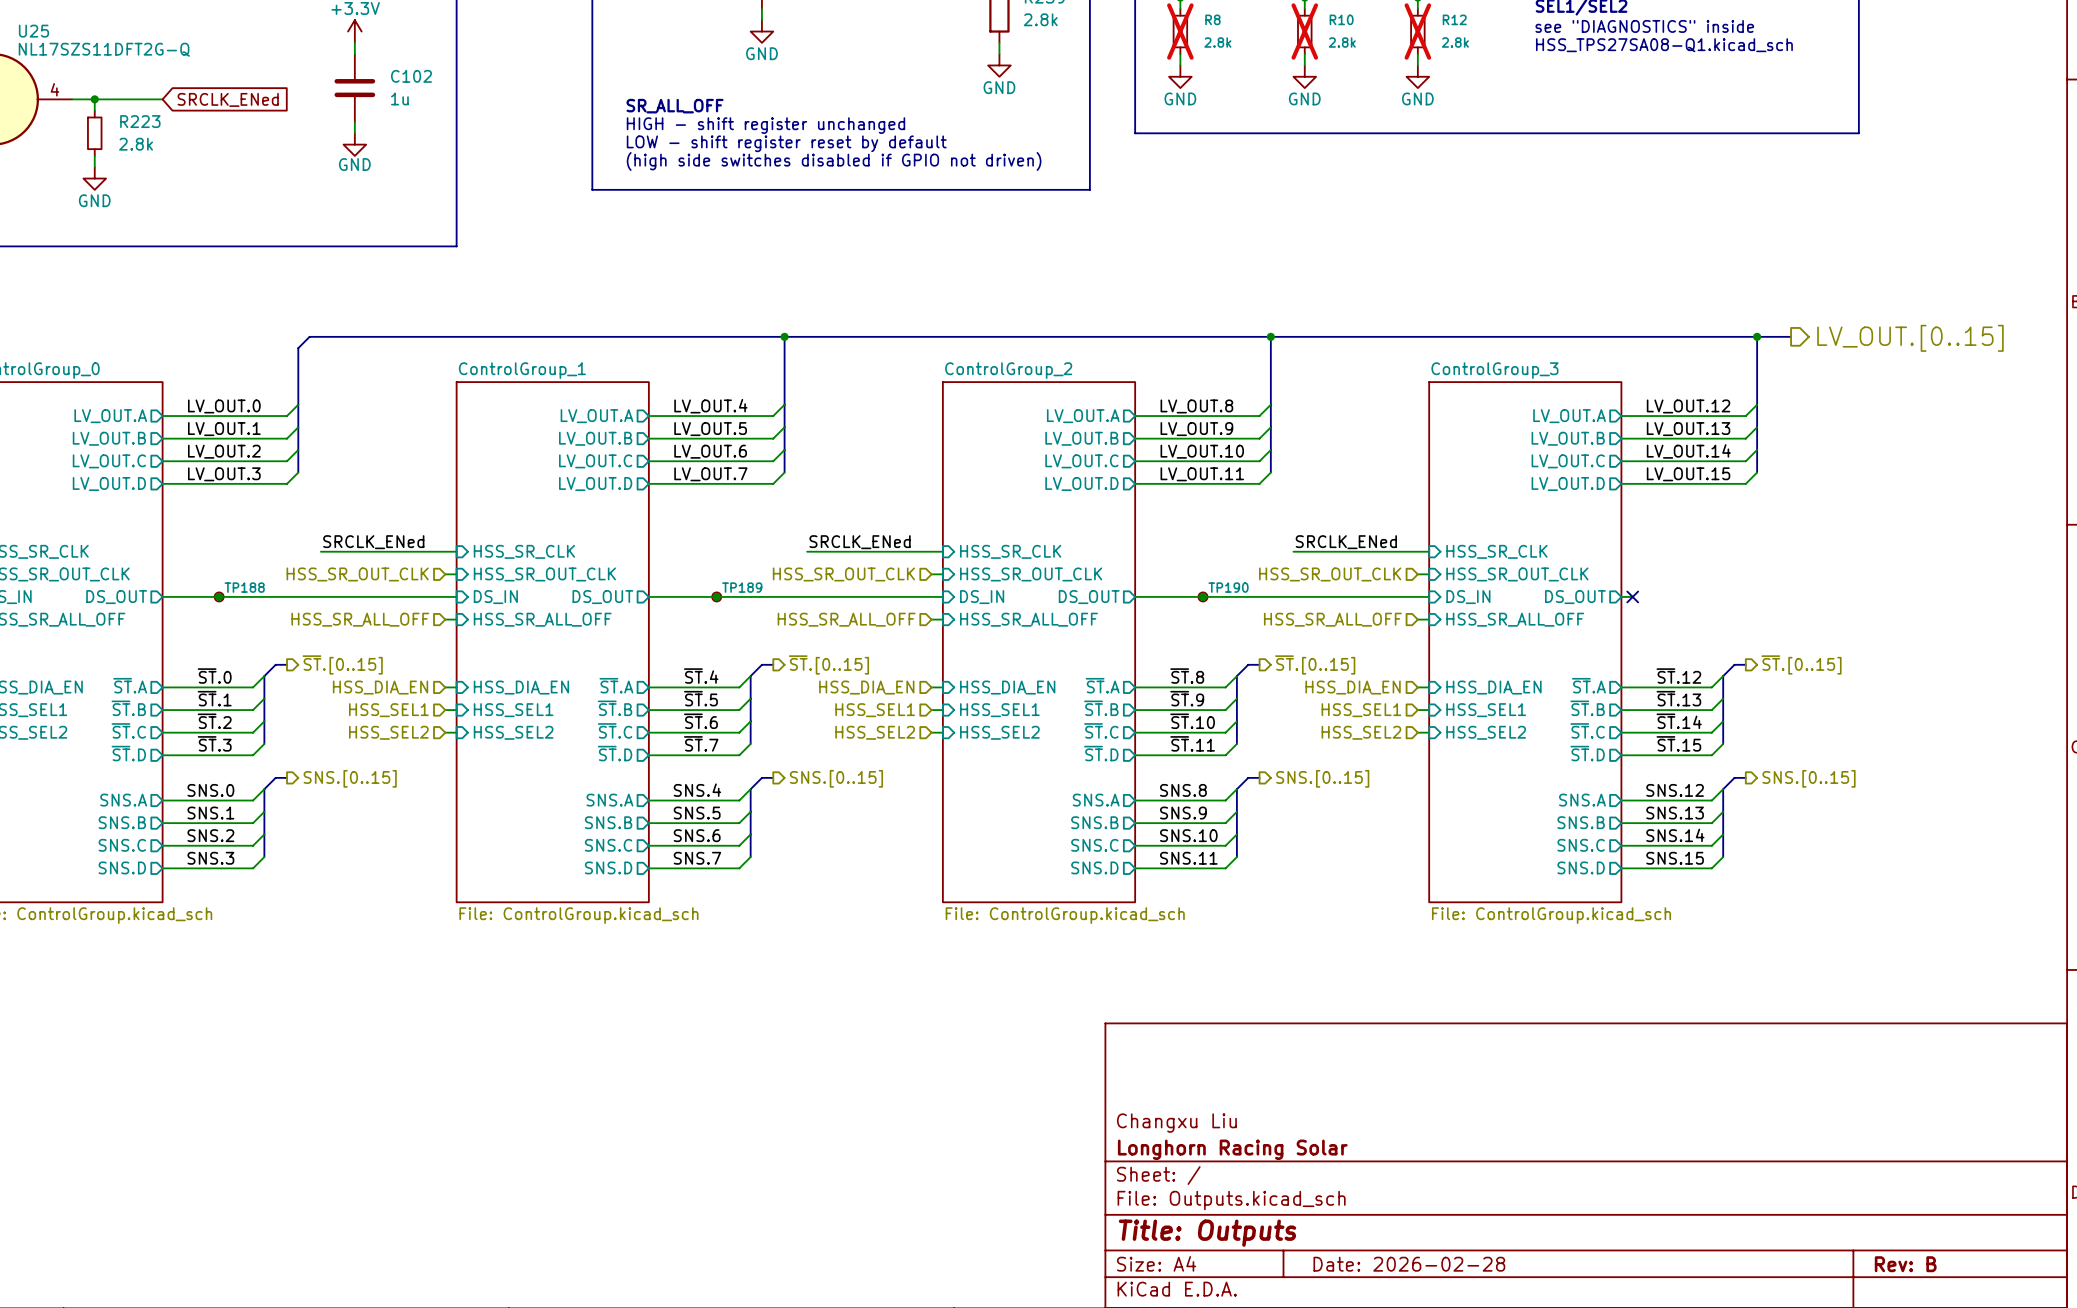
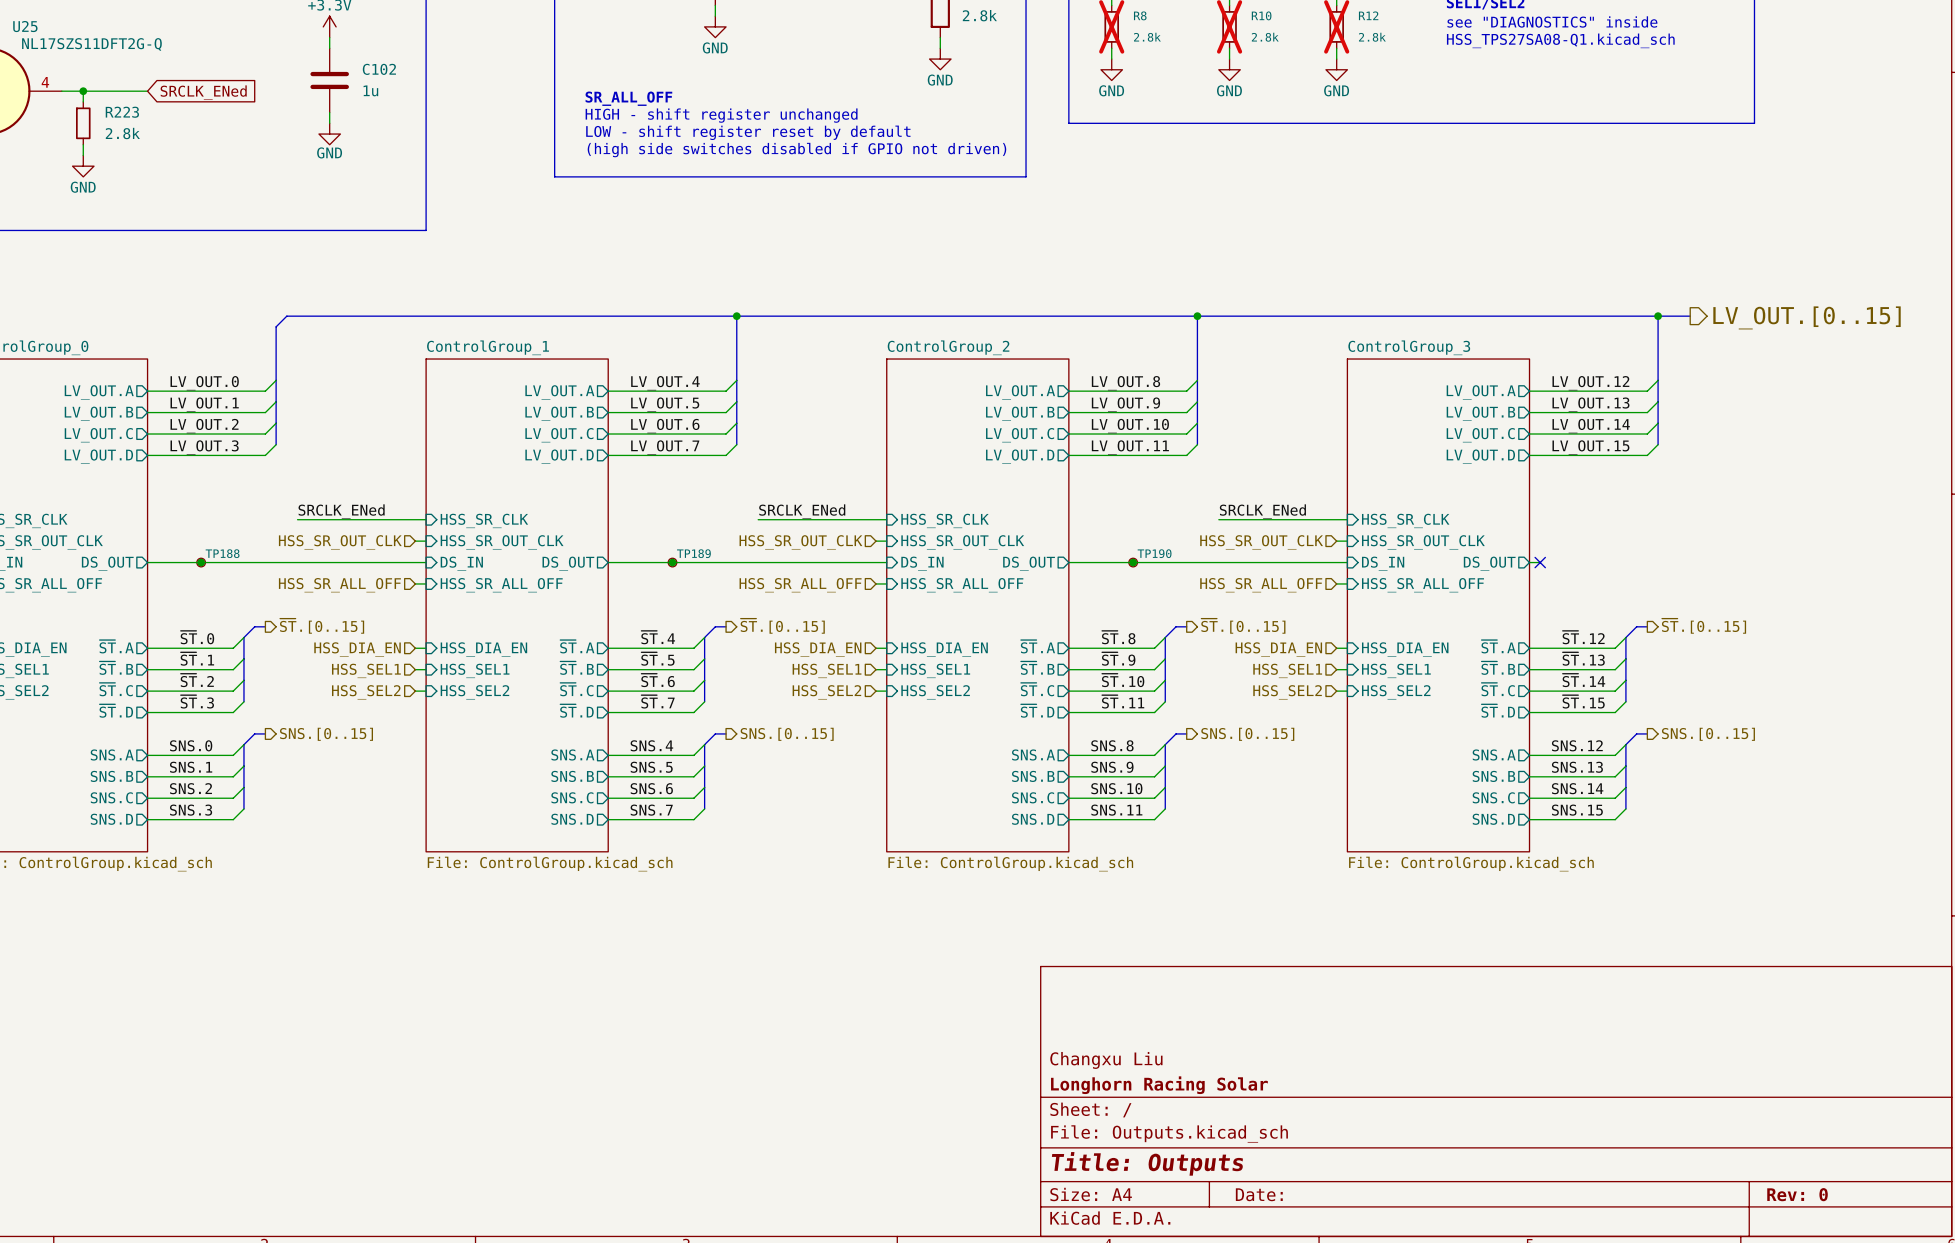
title block: Date: 2026-02-28 (1409, 1264) -> Date: (1259, 1194)
title block: Rev: B (1905, 1264) -> Rev: 0 (1797, 1194)

